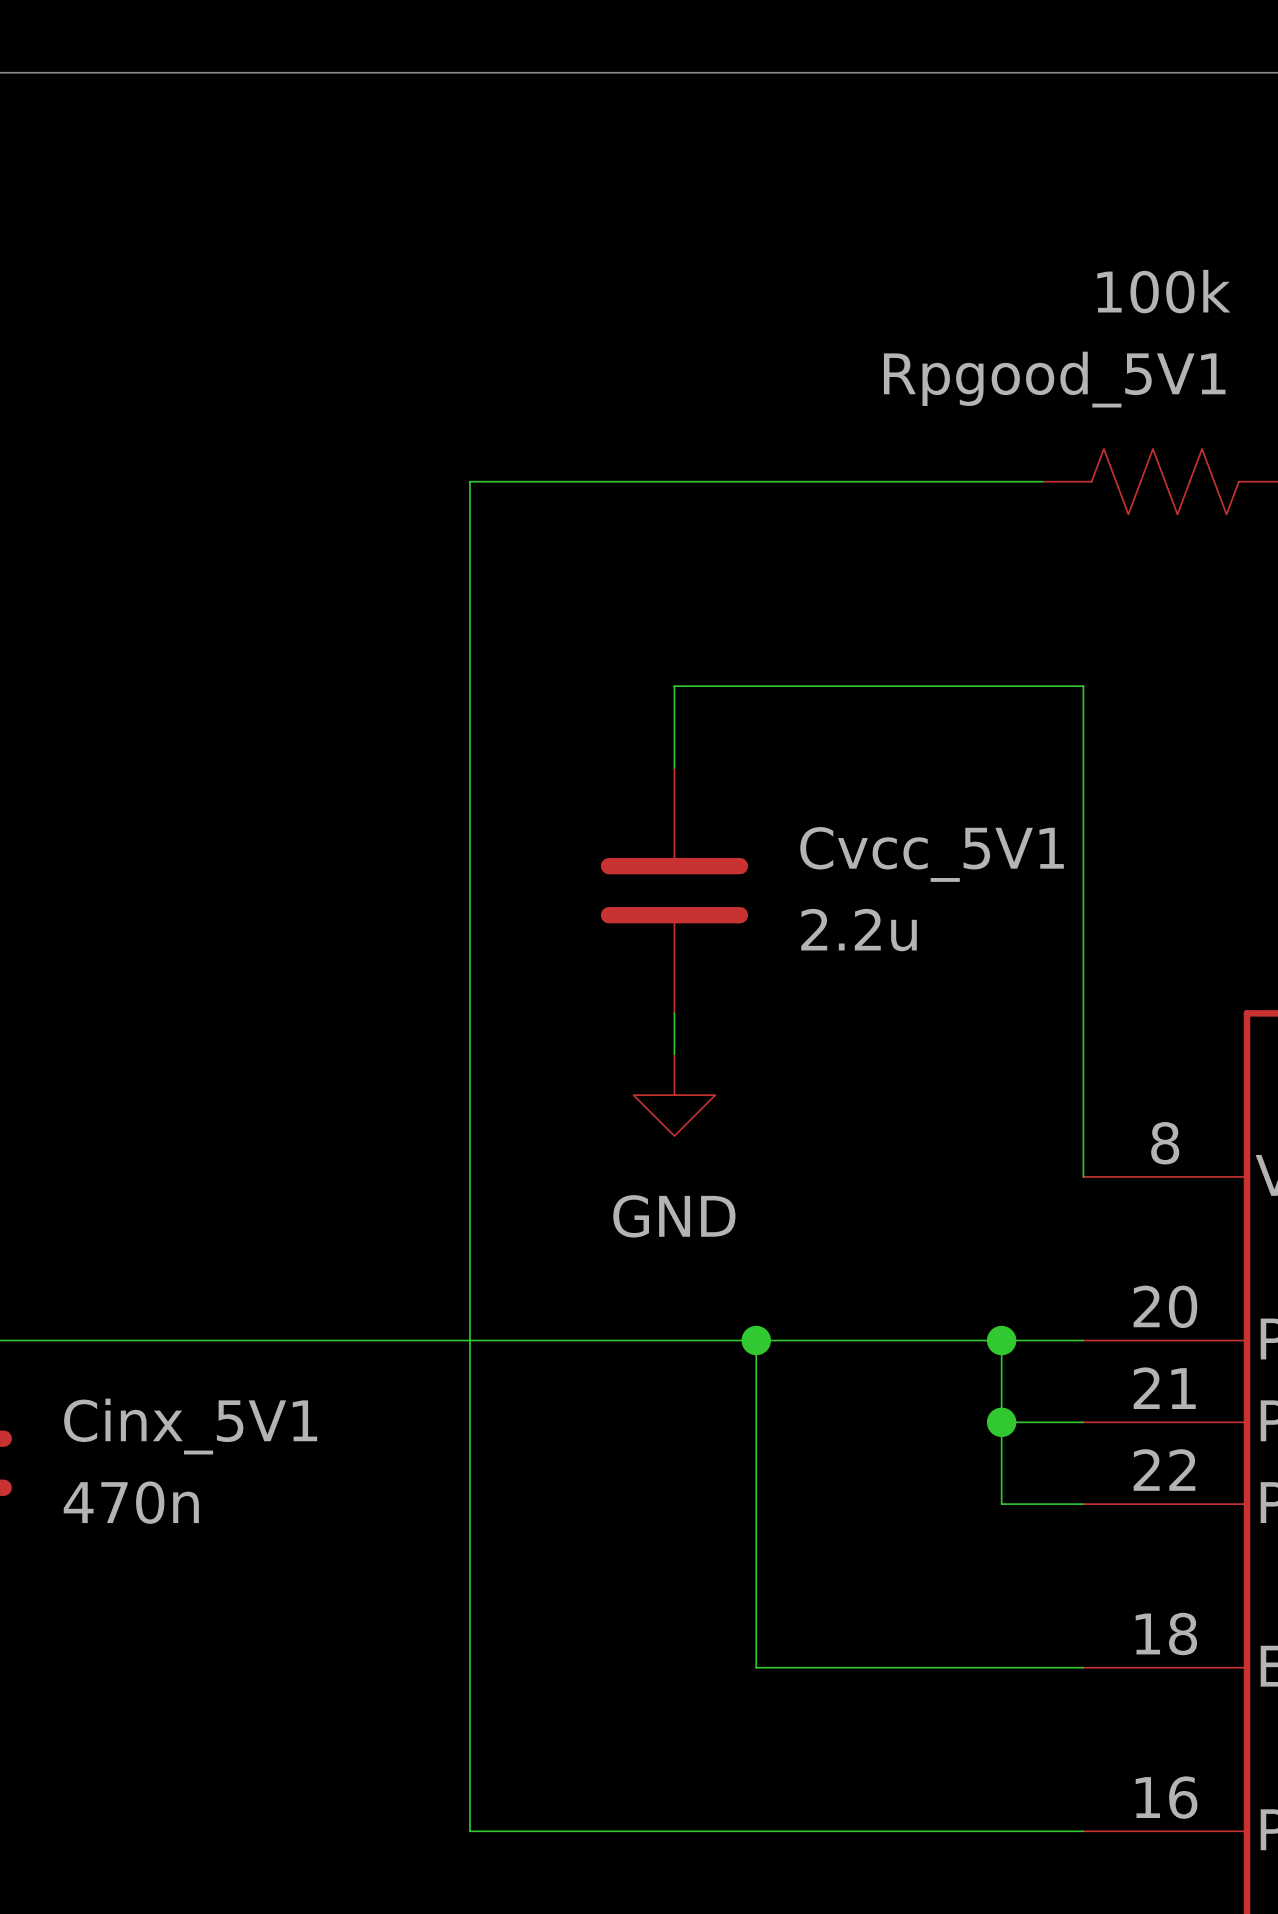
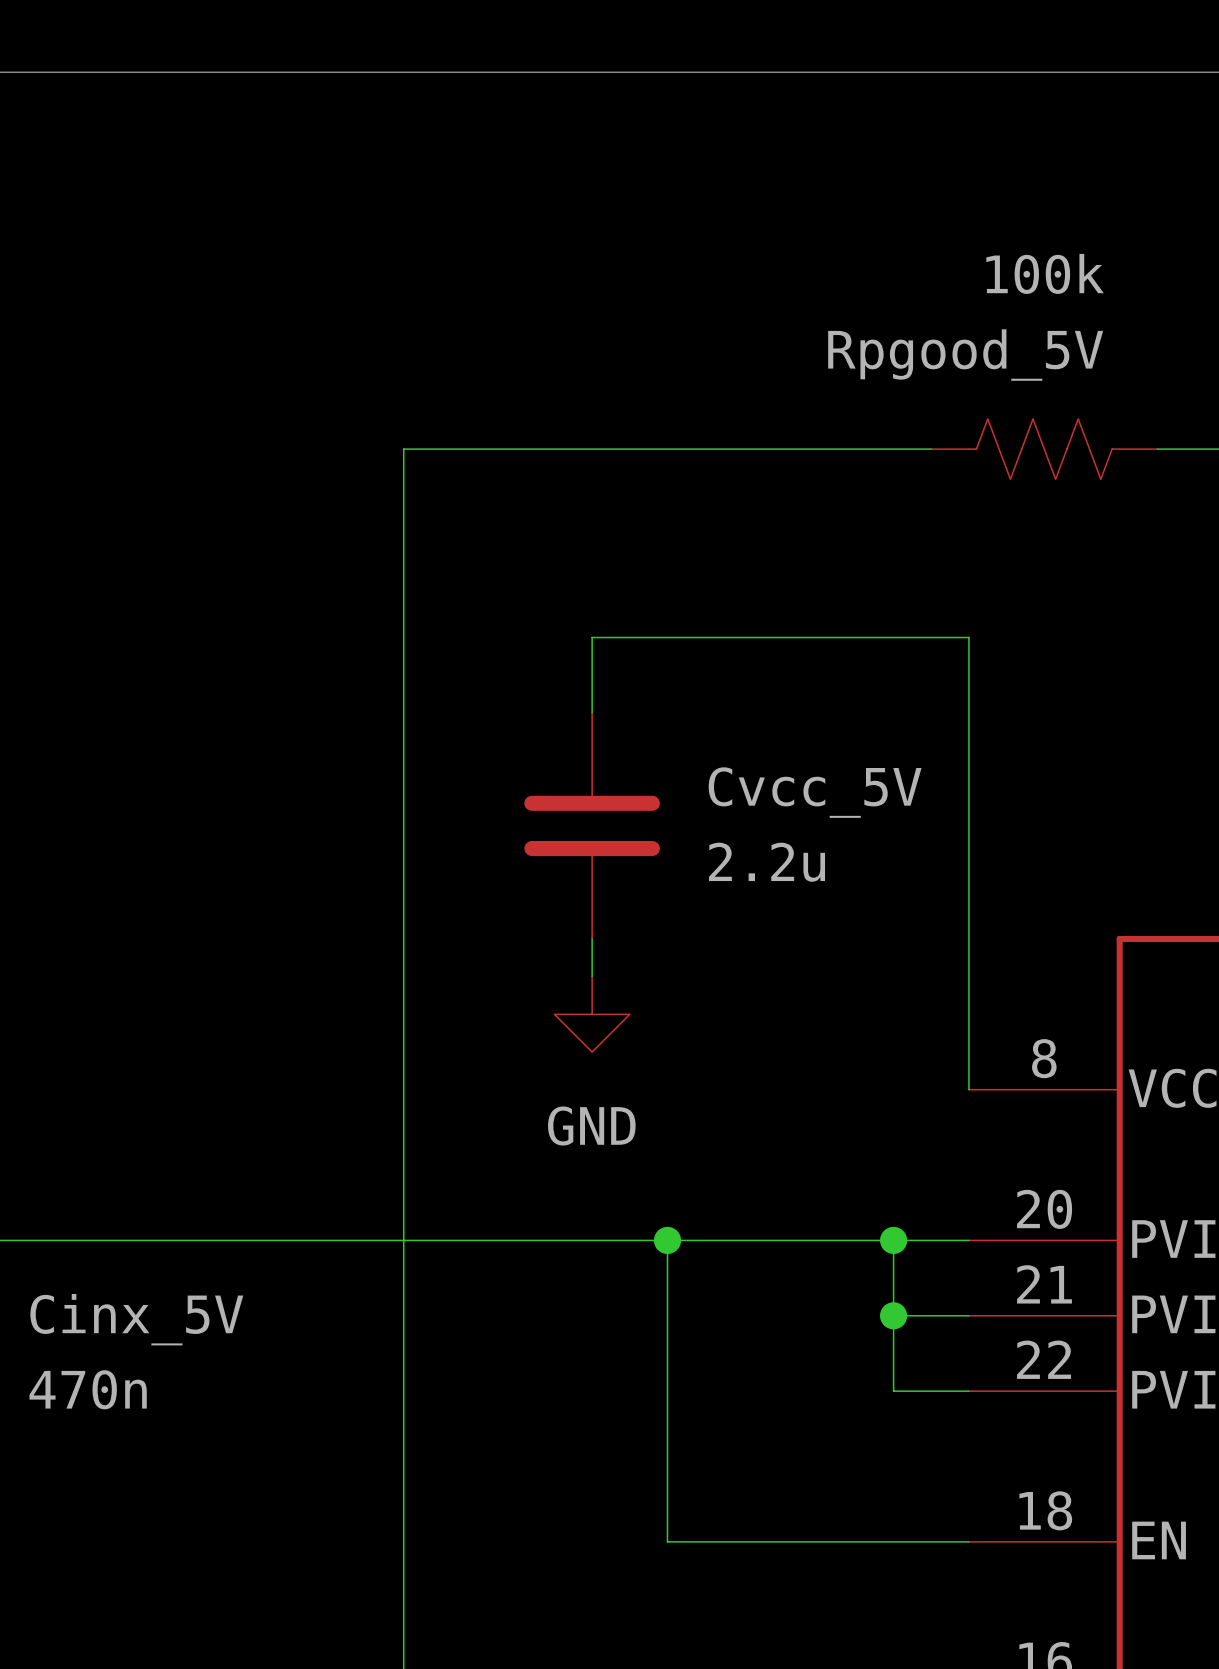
Rpgood_5V1 name: Rpgood_5V1 (1054, 379) -> Rpgood_5V (965, 355)
Cvcc_5V1 name: Cvcc_5V1 (932, 854) -> Cvcc_5V (815, 792)
Cinx_5V1 name: Cinx_5V1 (190, 1426) -> Cinx_5V (136, 1319)

